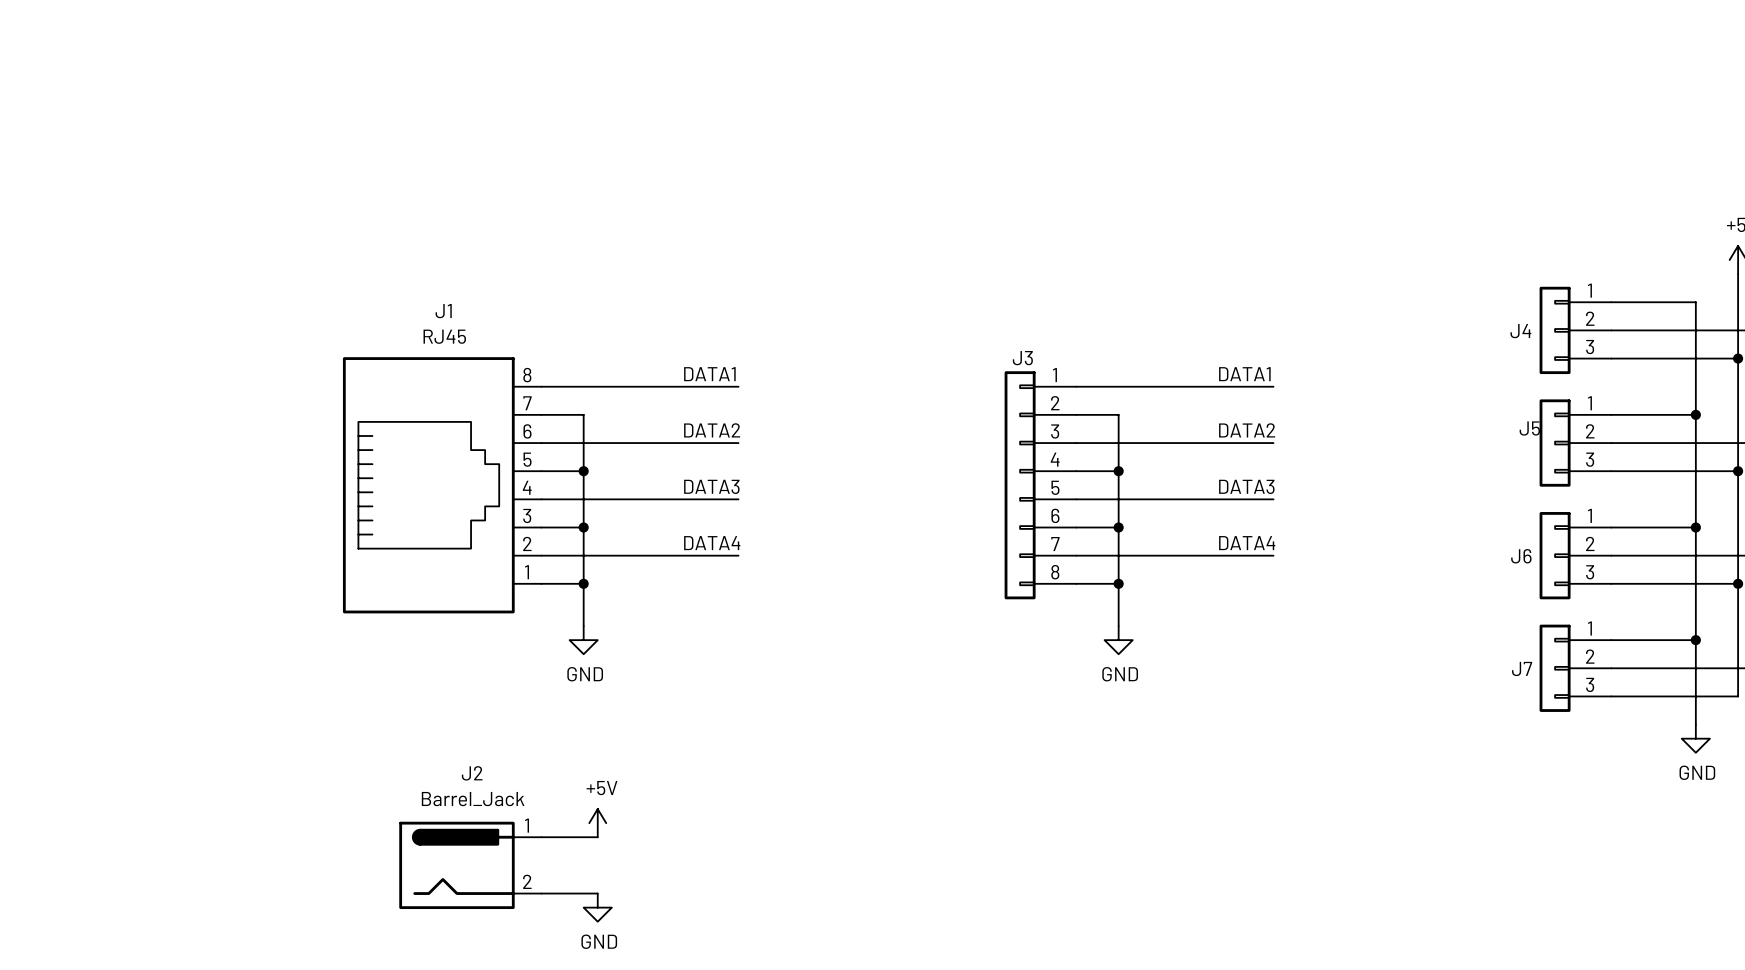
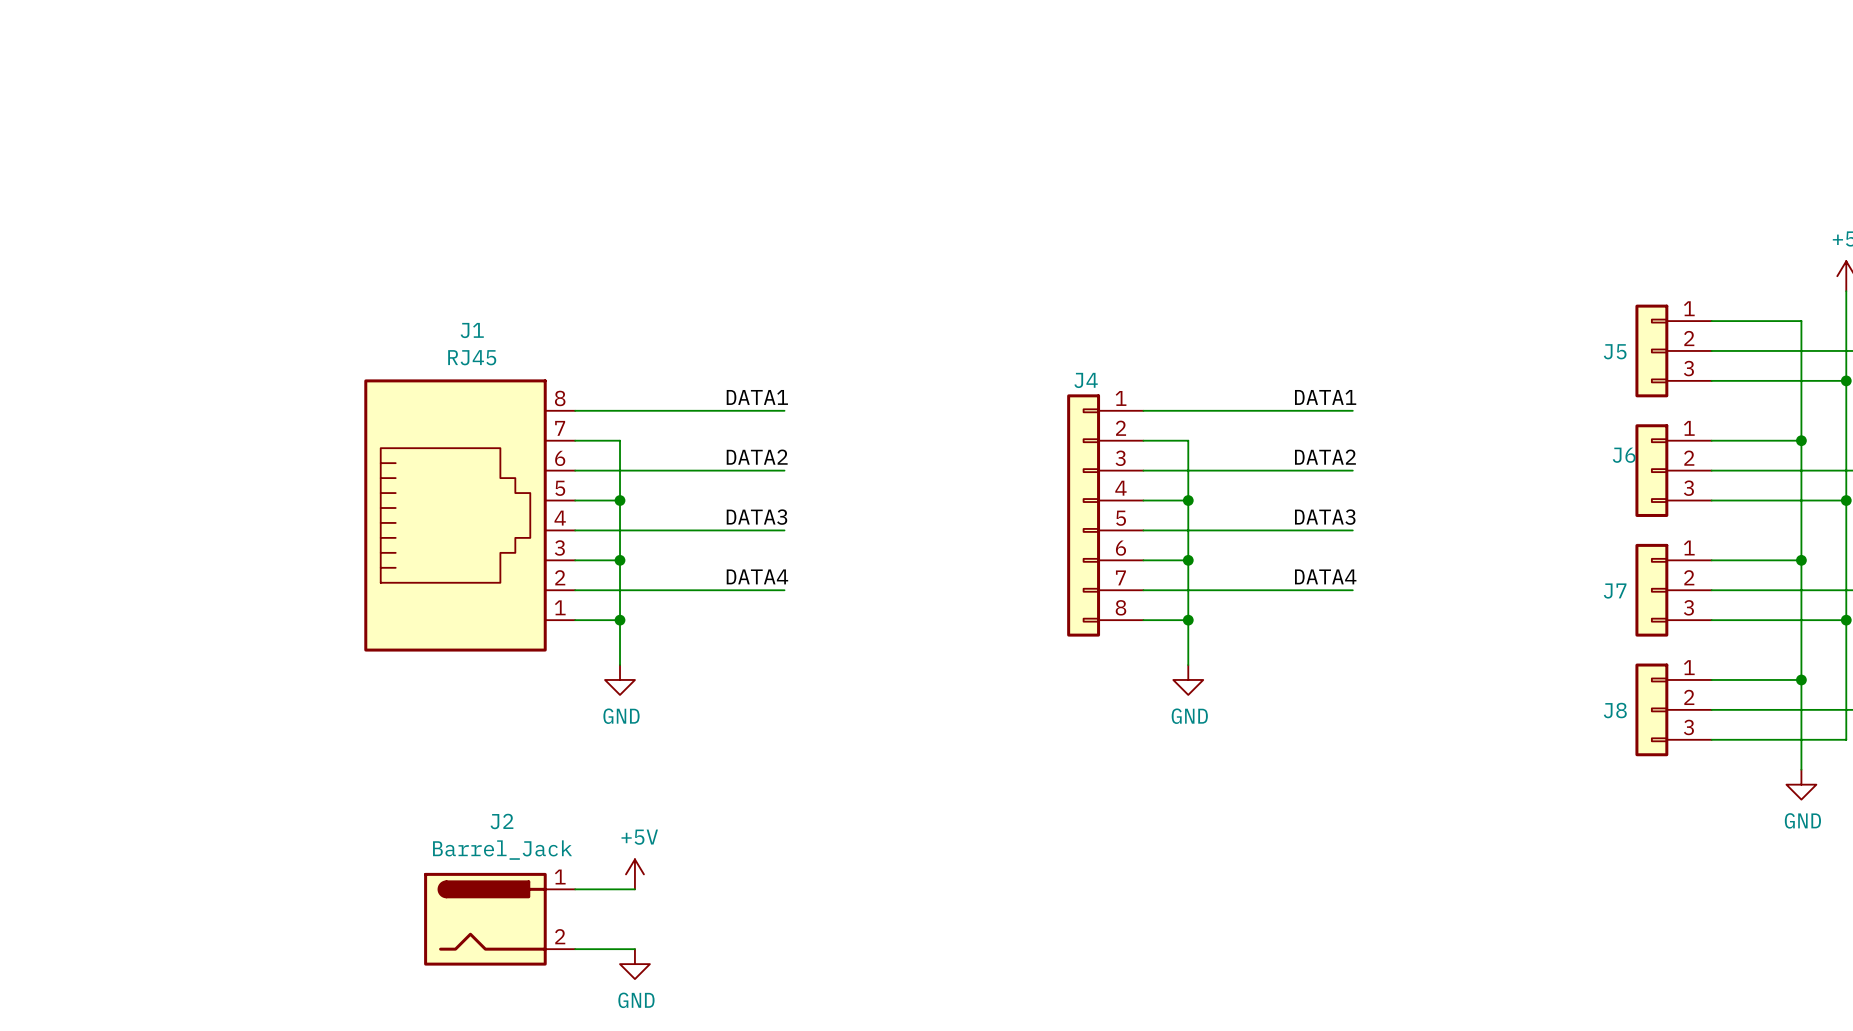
J4 name: J4 (1520, 331) -> J5 (1615, 351)
J3 name: J3 (1022, 358) -> J4 (1086, 380)
J5 name: J5 (1529, 428) -> J6 (1624, 455)
J6 name: J6 (1521, 556) -> J7 (1615, 591)
J7 name: J7 (1522, 668) -> J8 (1615, 710)

